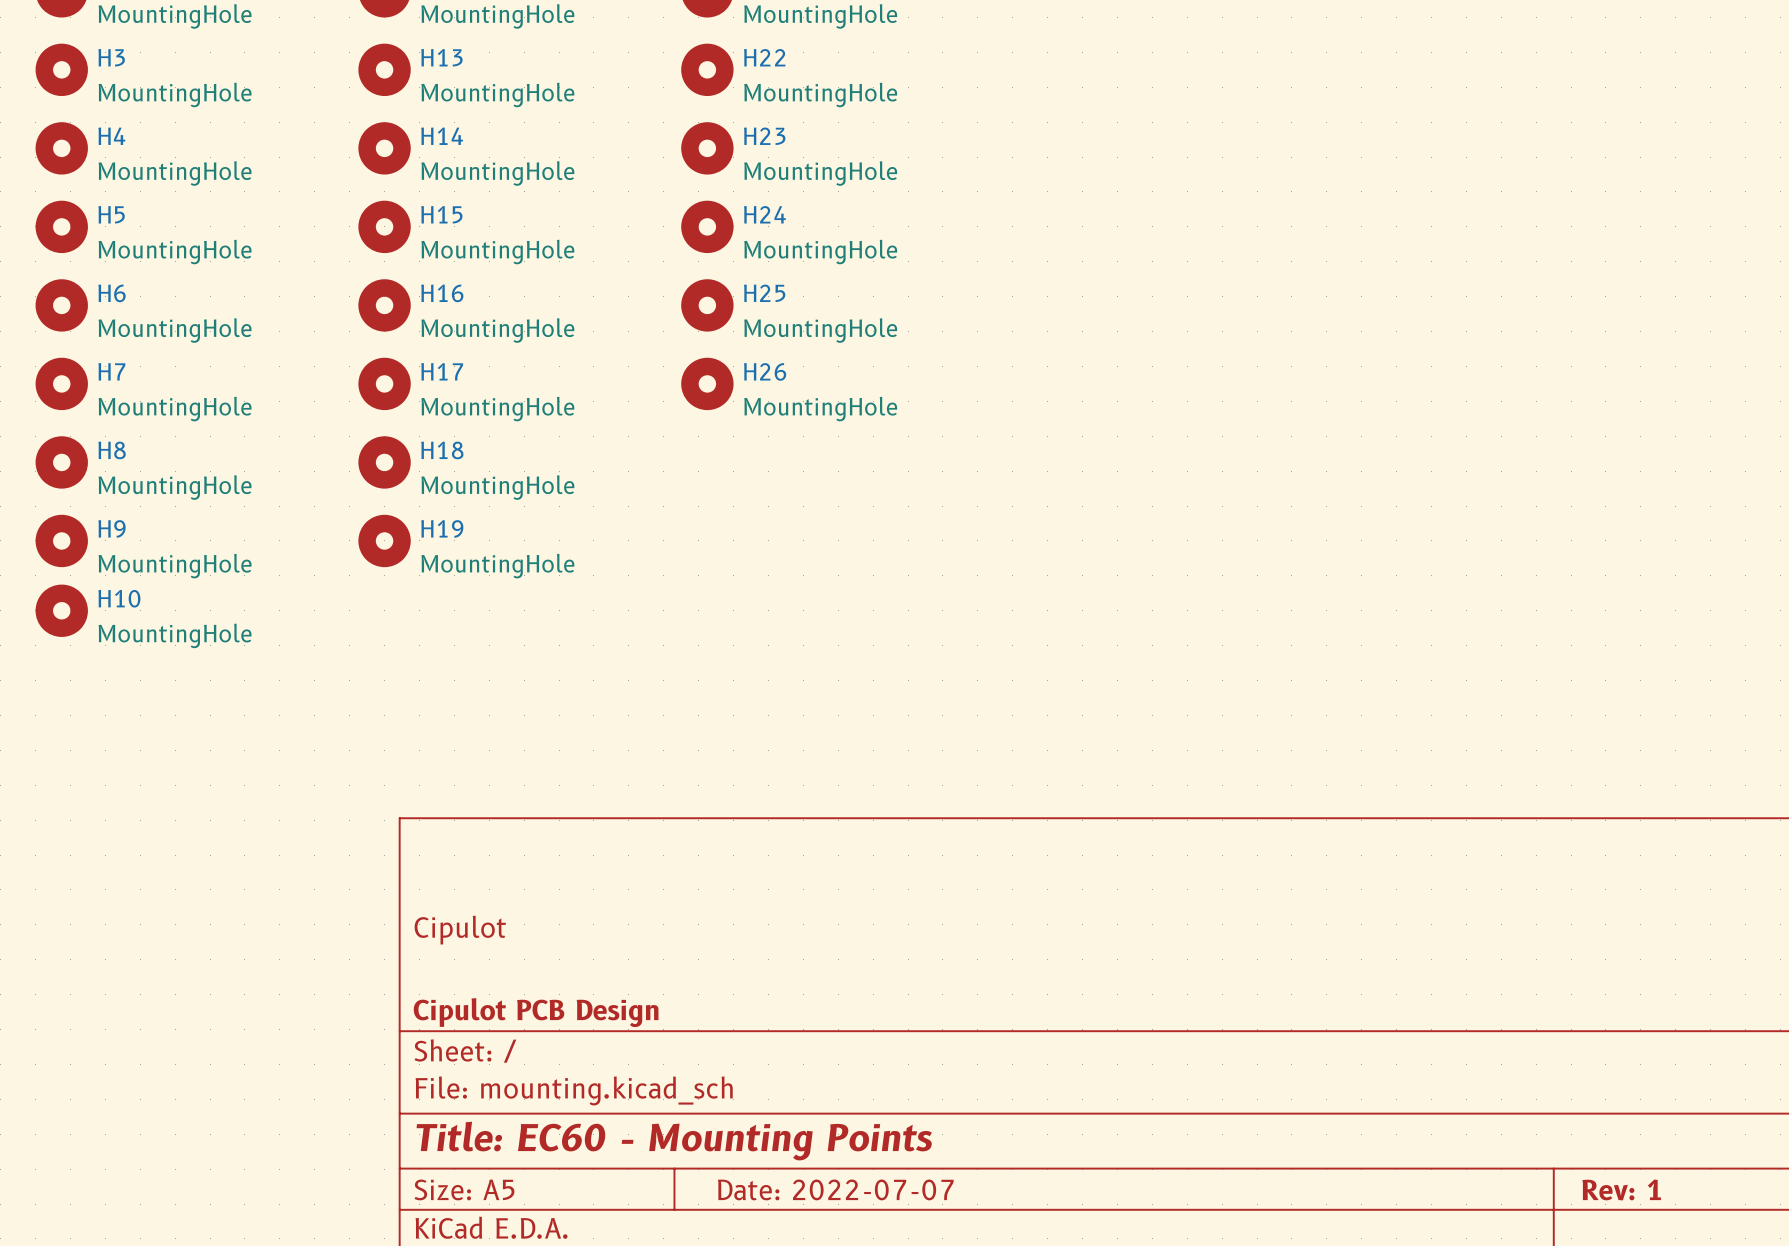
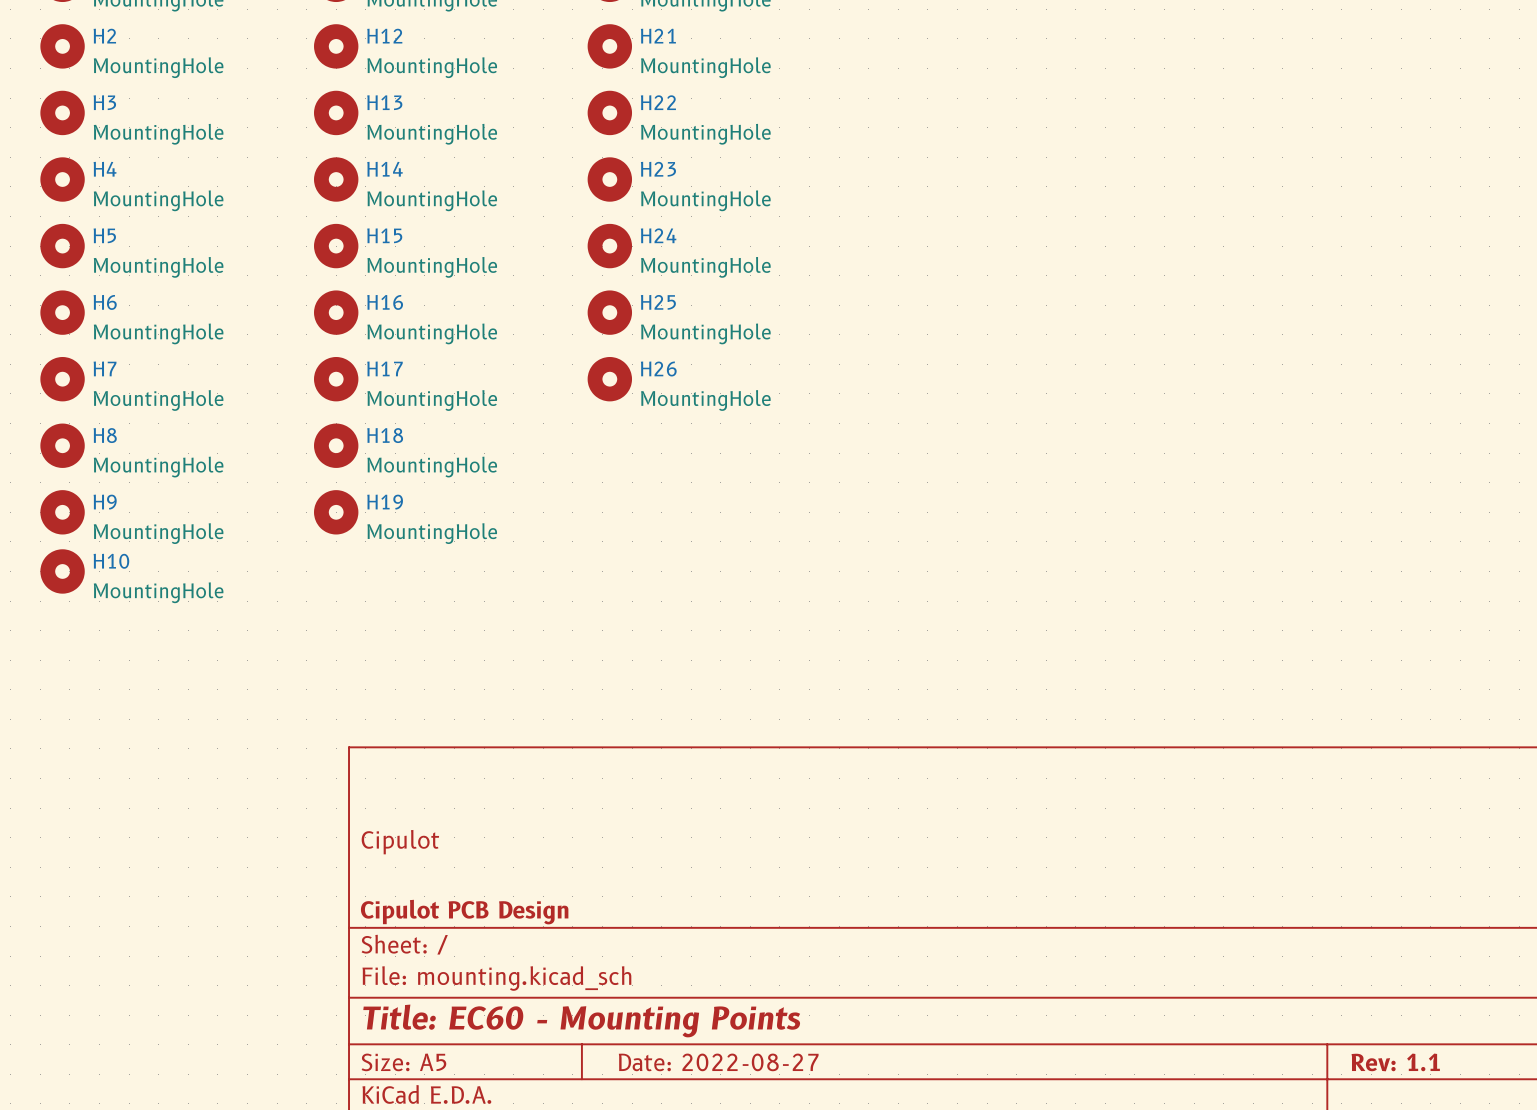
title block: Date: 2022-07-07 (835, 1189) -> Date: 2022-08-27 (718, 1062)
title block: Rev: 1 (1621, 1189) -> Rev: 1.1 (1395, 1062)

